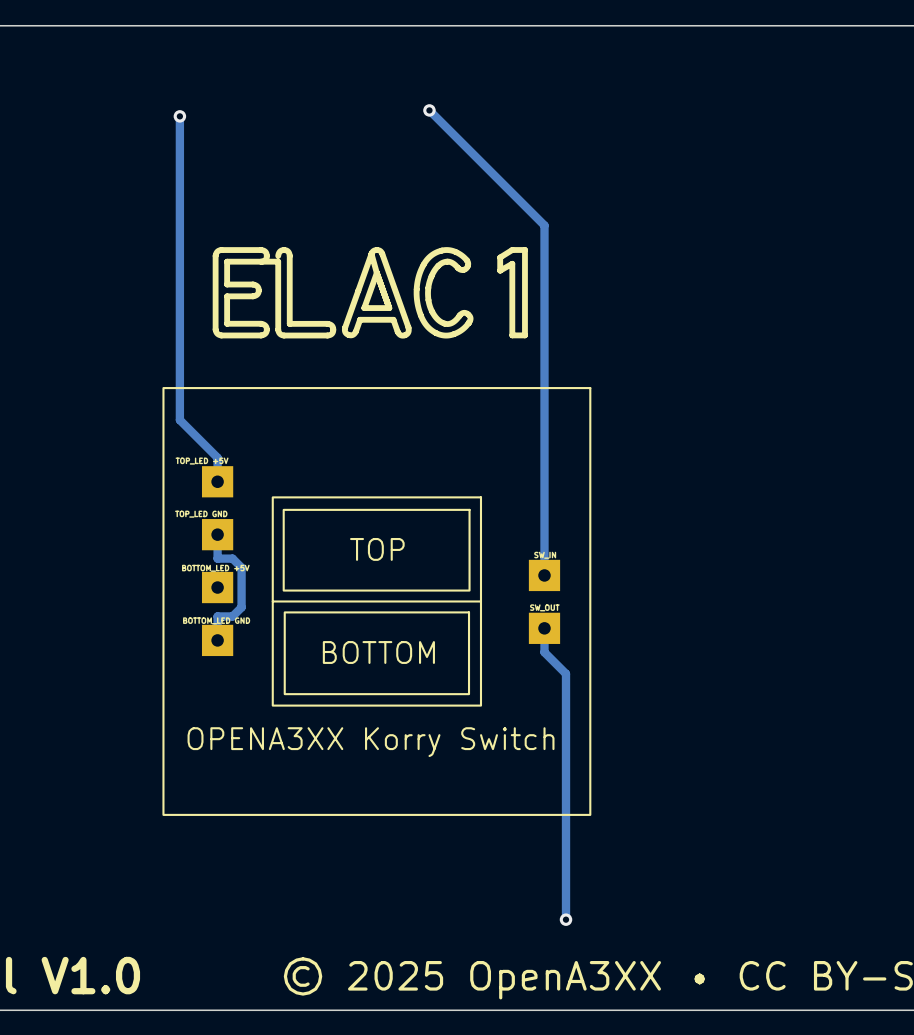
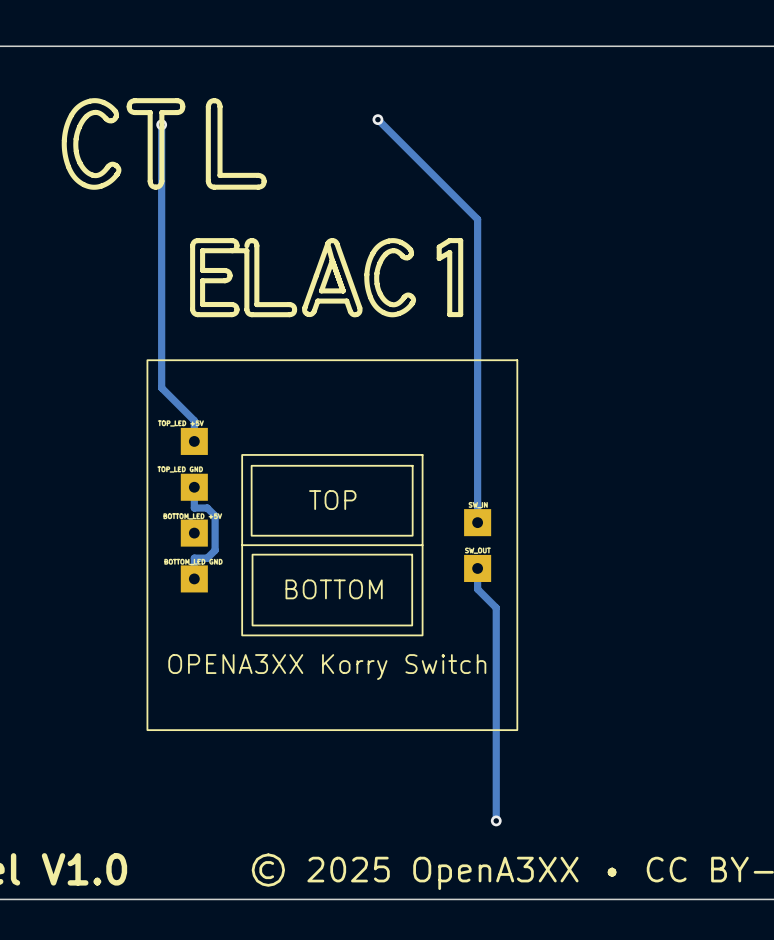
line: none -> (177, 100) (134, 100) (129, 104) (129, 109) (132, 112) (150, 112) (150, 181) (153, 186) (159, 186) (161, 181) (161, 112) (180, 111) (182, 104) (177, 100)
line: none -> (214, 100) (218, 102) (220, 106) (220, 175) (259, 175) (263, 179) (261, 186) (214, 187) (209, 184) (208, 106) (210, 102) (214, 100)
line: none -> (117, 174) (118, 168) (112, 164) (100, 174) (92, 175) (84, 170) (79, 161) (76, 151) (76, 138) (84, 118) (94, 112) (99, 113) (110, 120) (114, 119) (116, 115) (112, 107) (102, 101) (93, 100) (84, 103) (73, 112) (65, 130) (64, 150) (69, 169) (78, 181) (91, 187) (105, 184) (117, 174)

